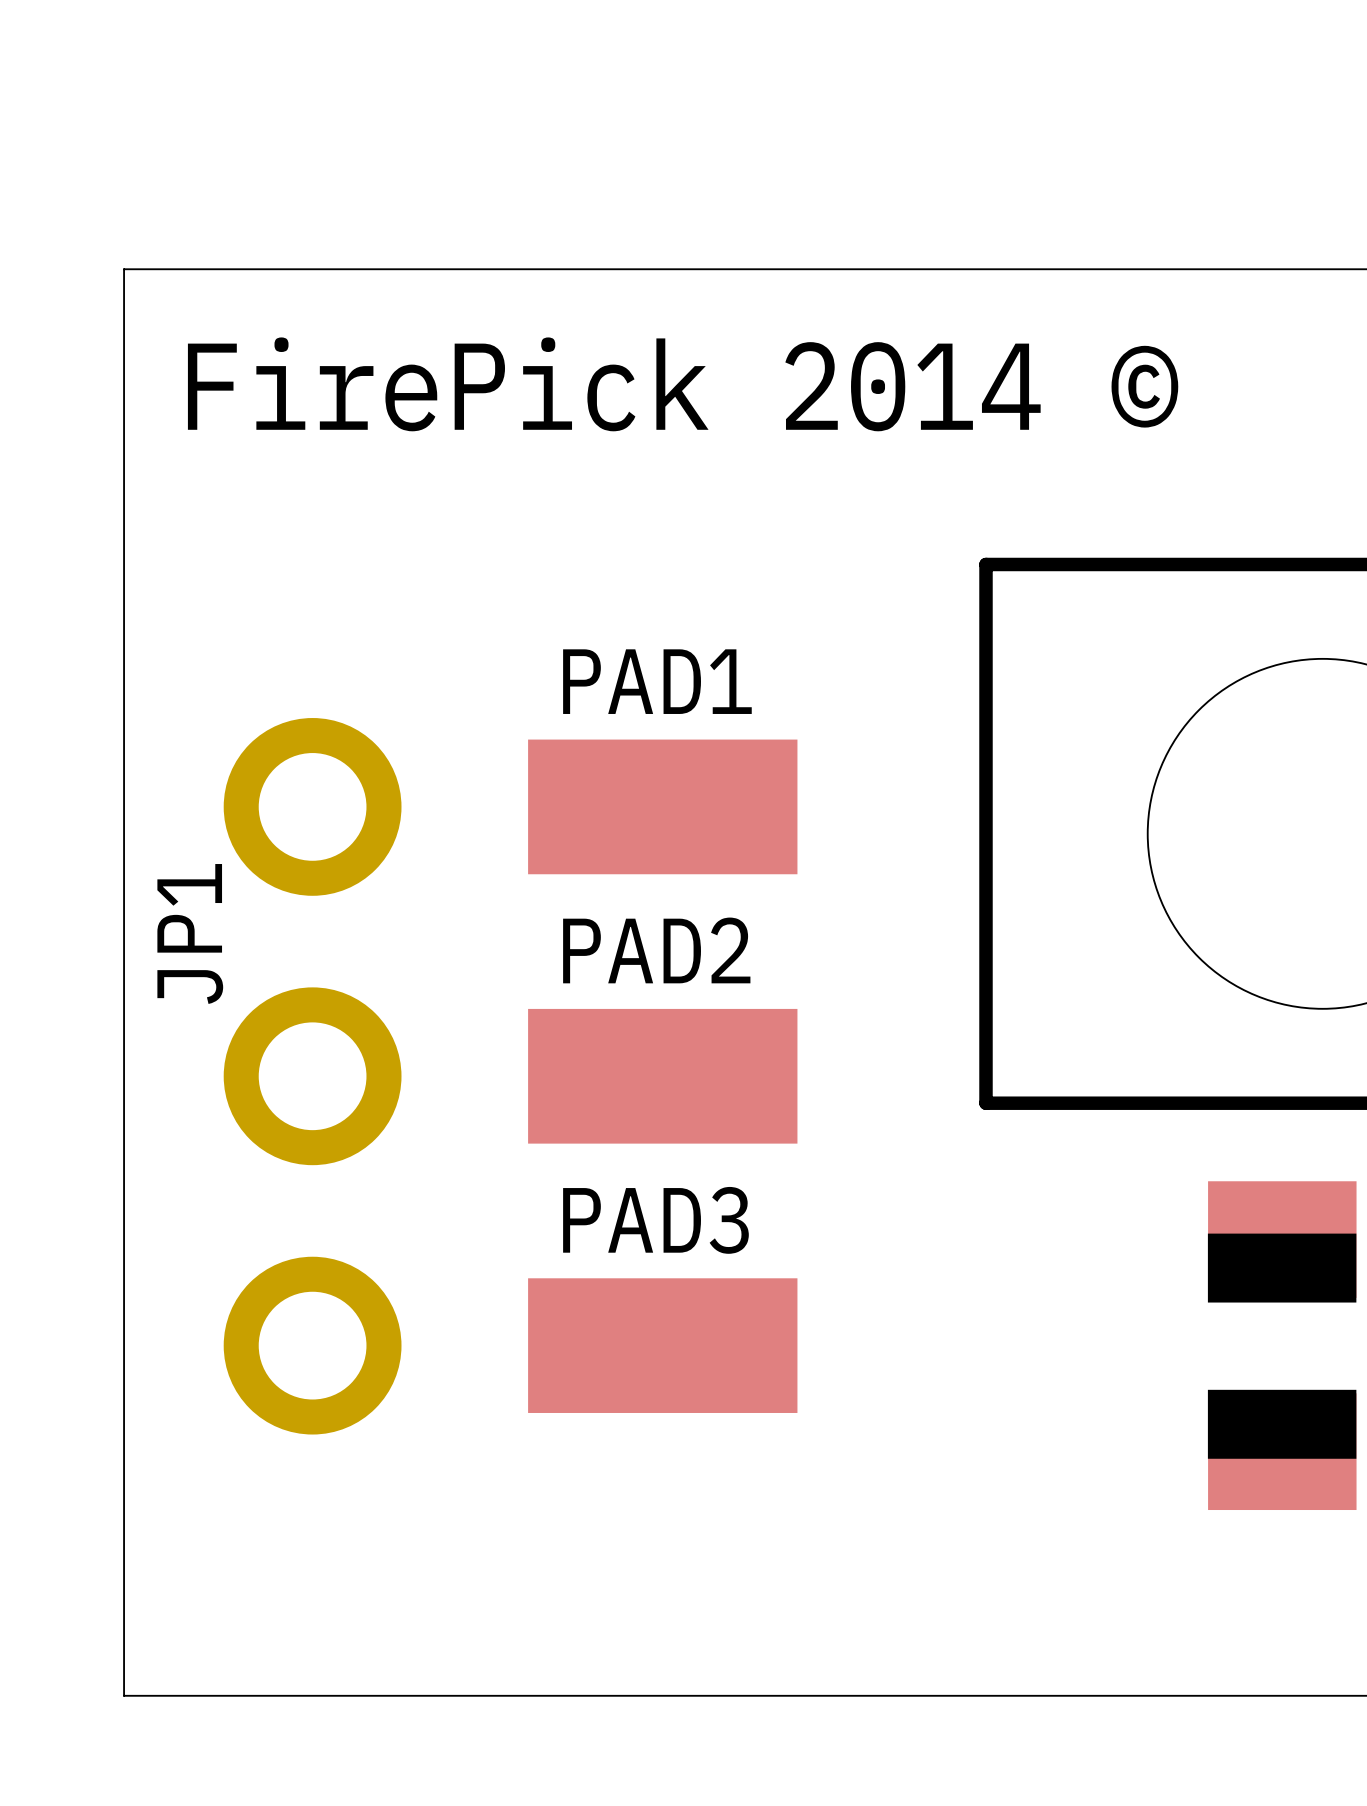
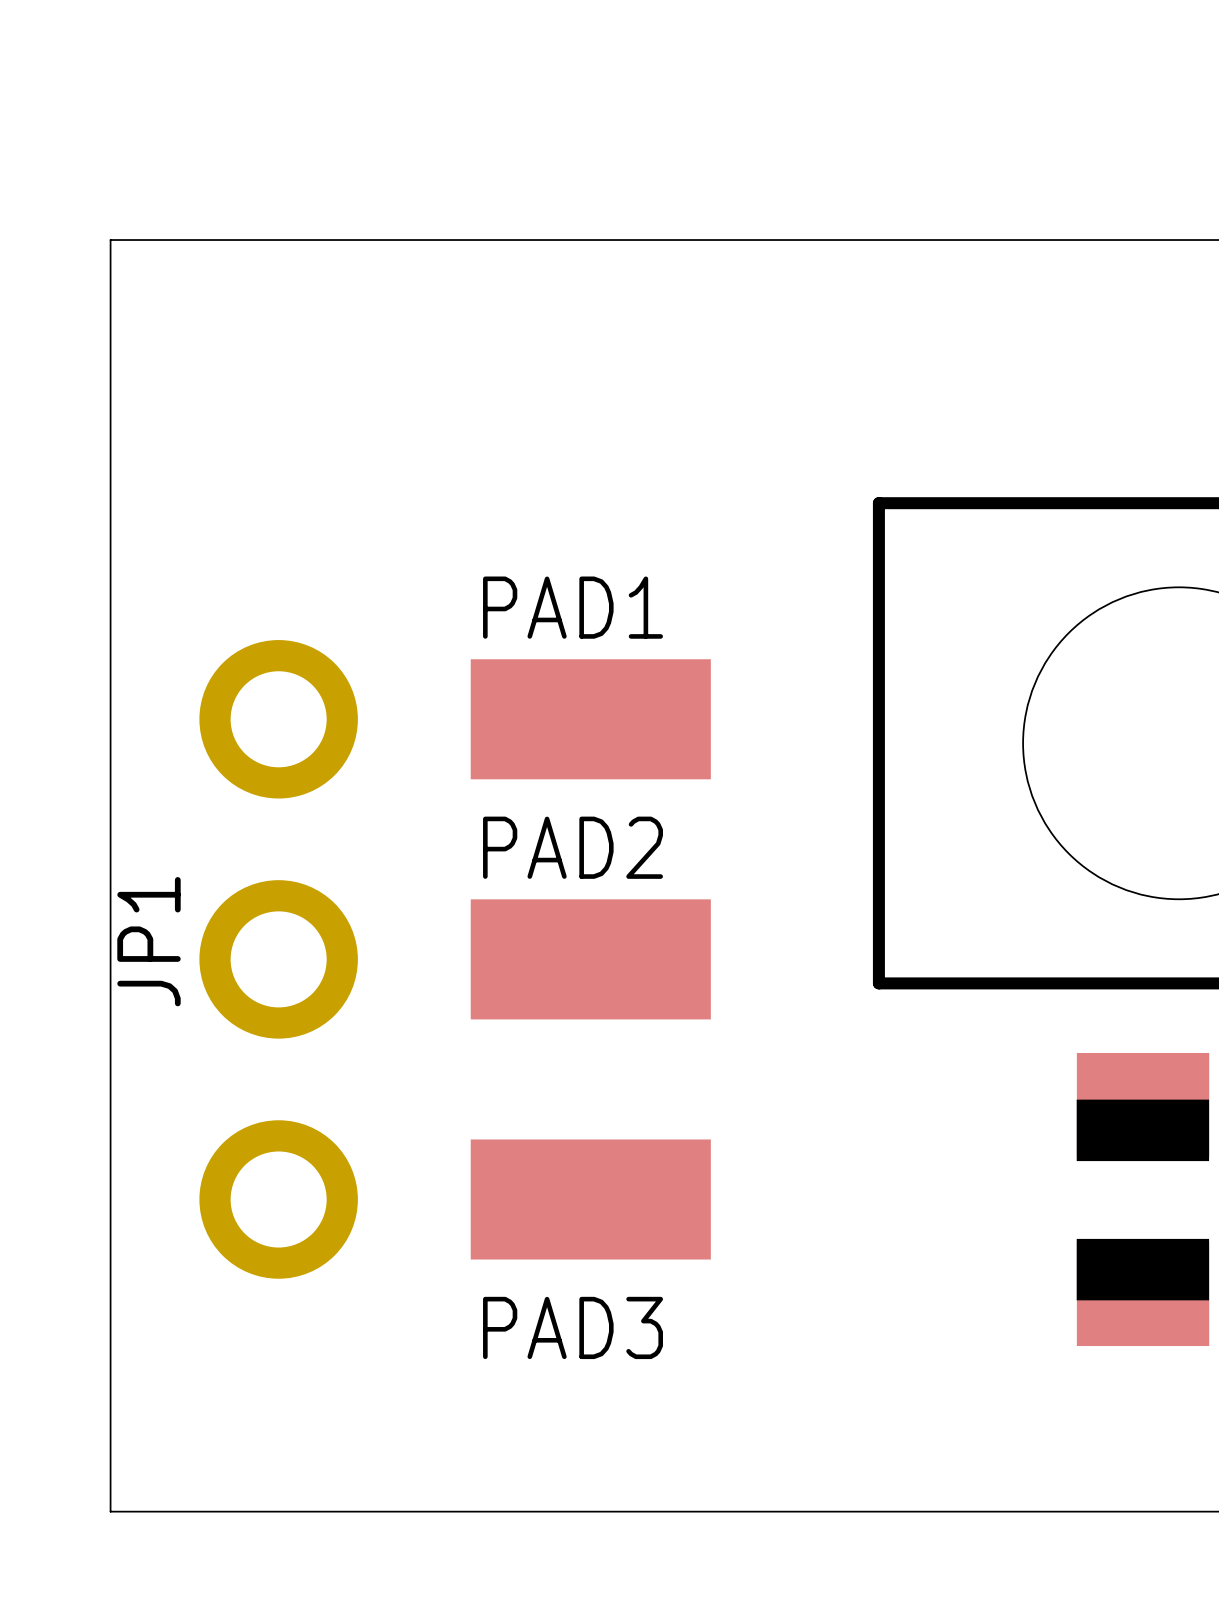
text: FirePick 2014 © (683, 384) -> none
JP1 name position: JP1 (190, 933) -> JP1 (148, 941)
PAD3 name position: PAD3 (655, 1220) -> PAD3 (573, 1327)

